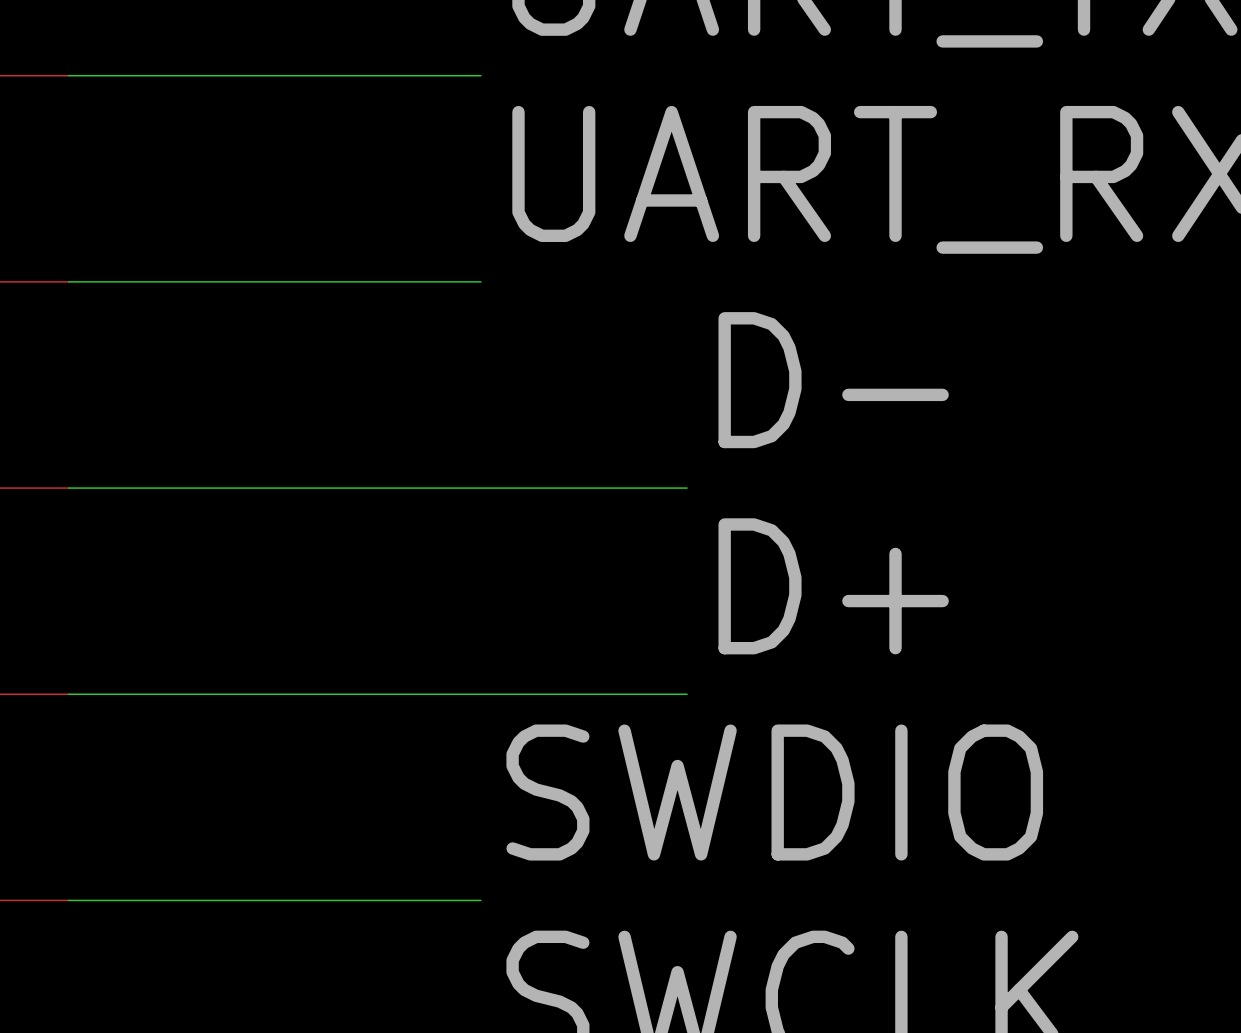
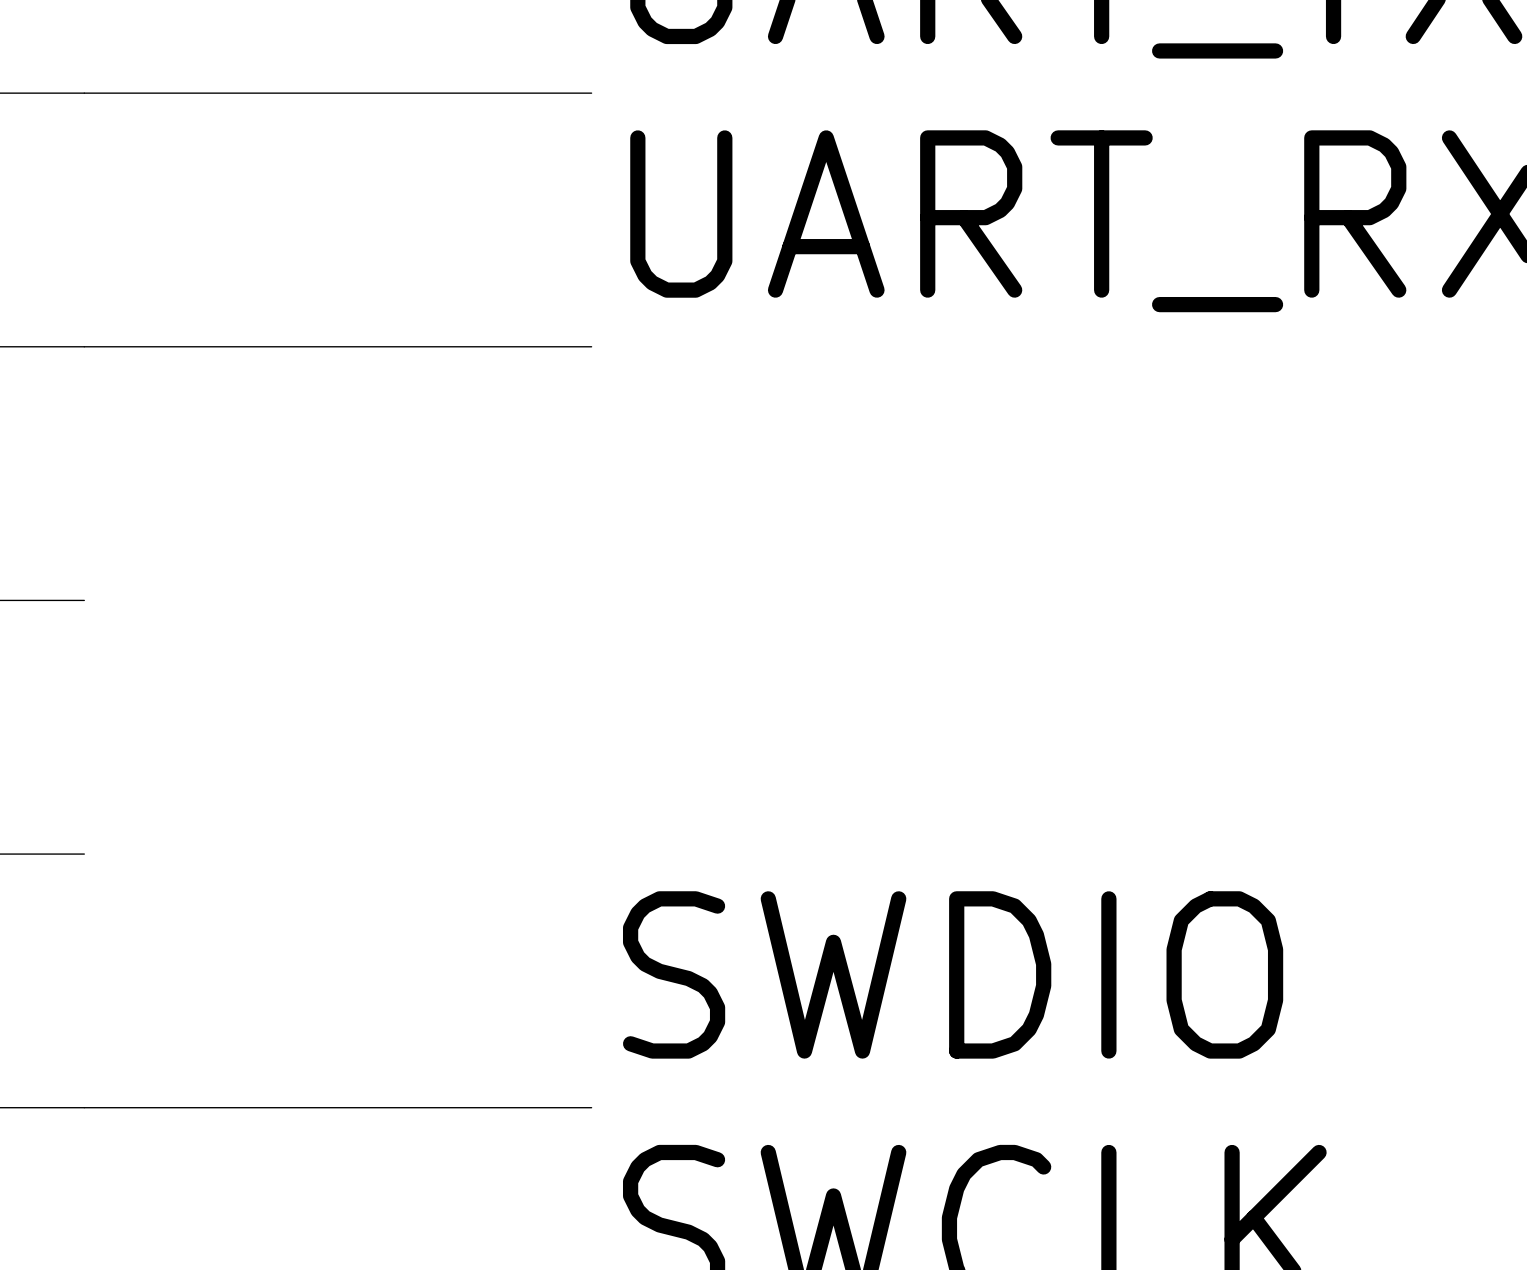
label: D- (833, 380) -> none
wire: (68, 488) (687, 488) -> none
label: D+ (833, 586) -> none
wire: (68, 694) (687, 694) -> none

